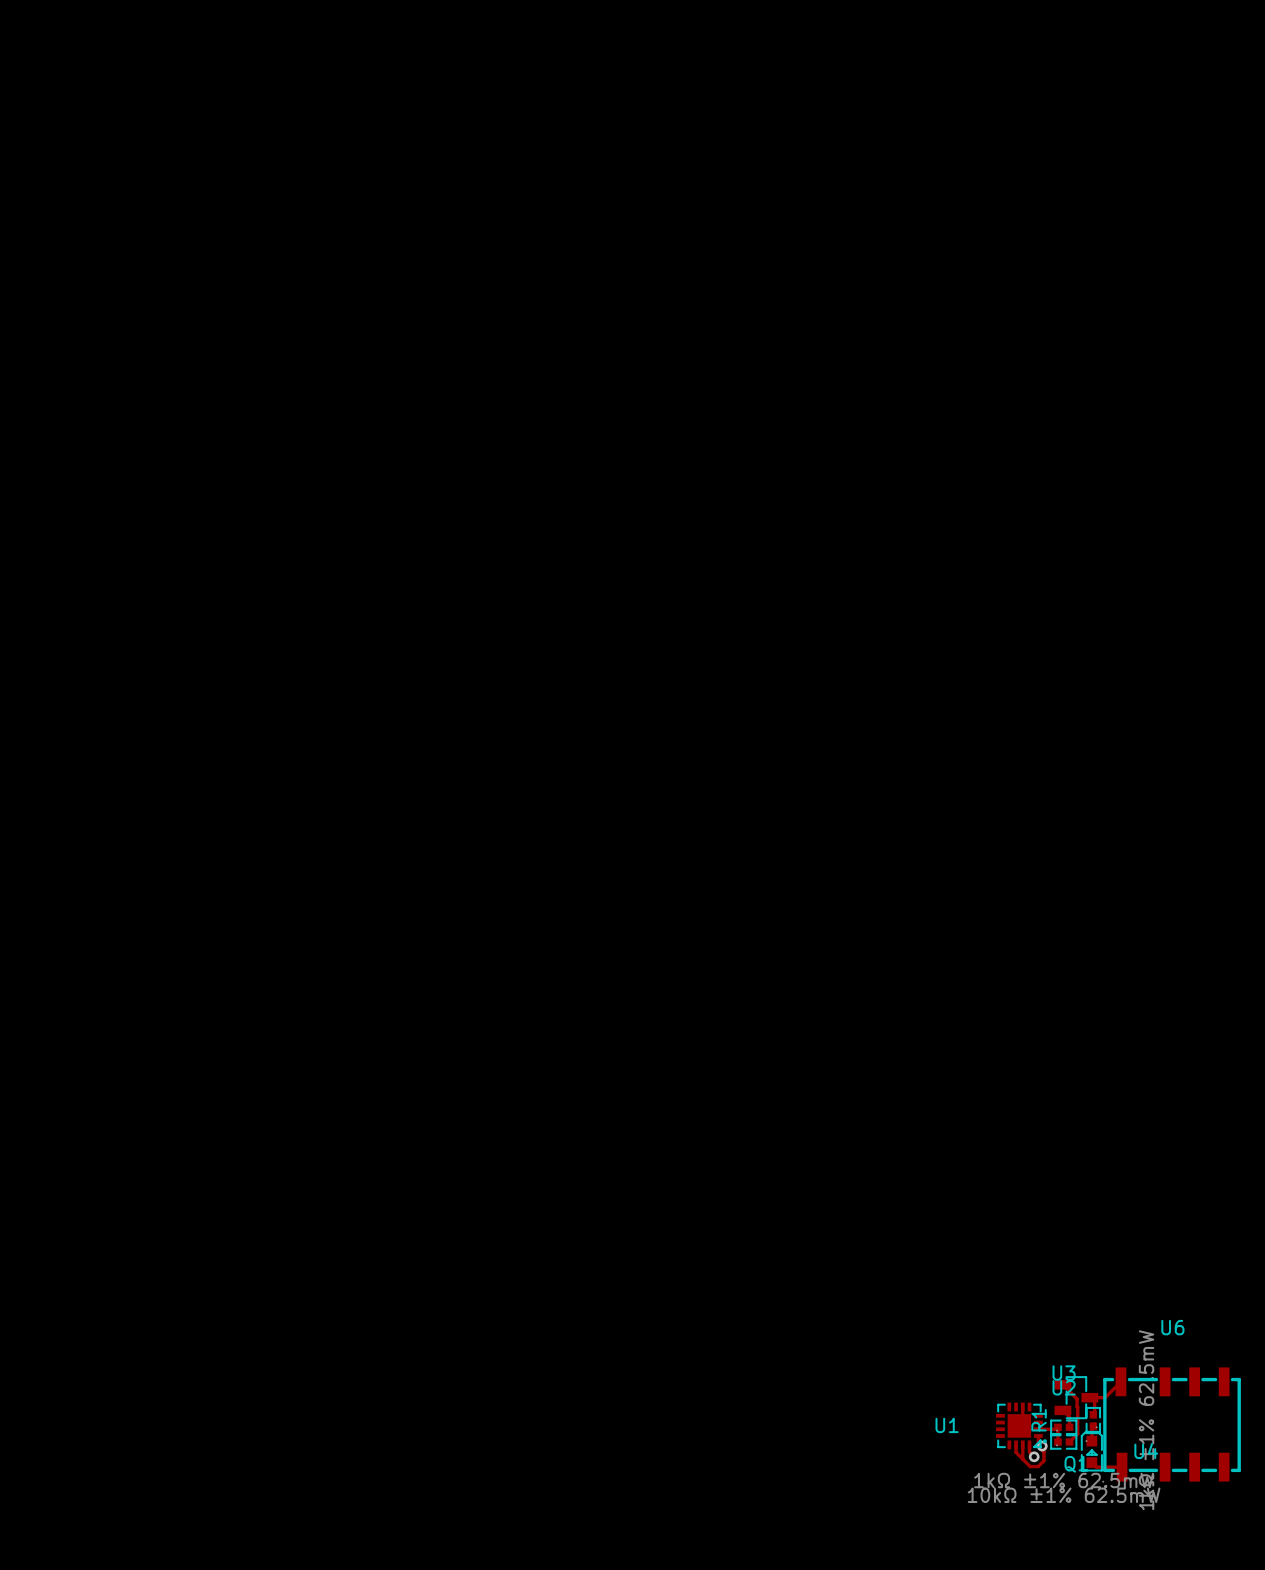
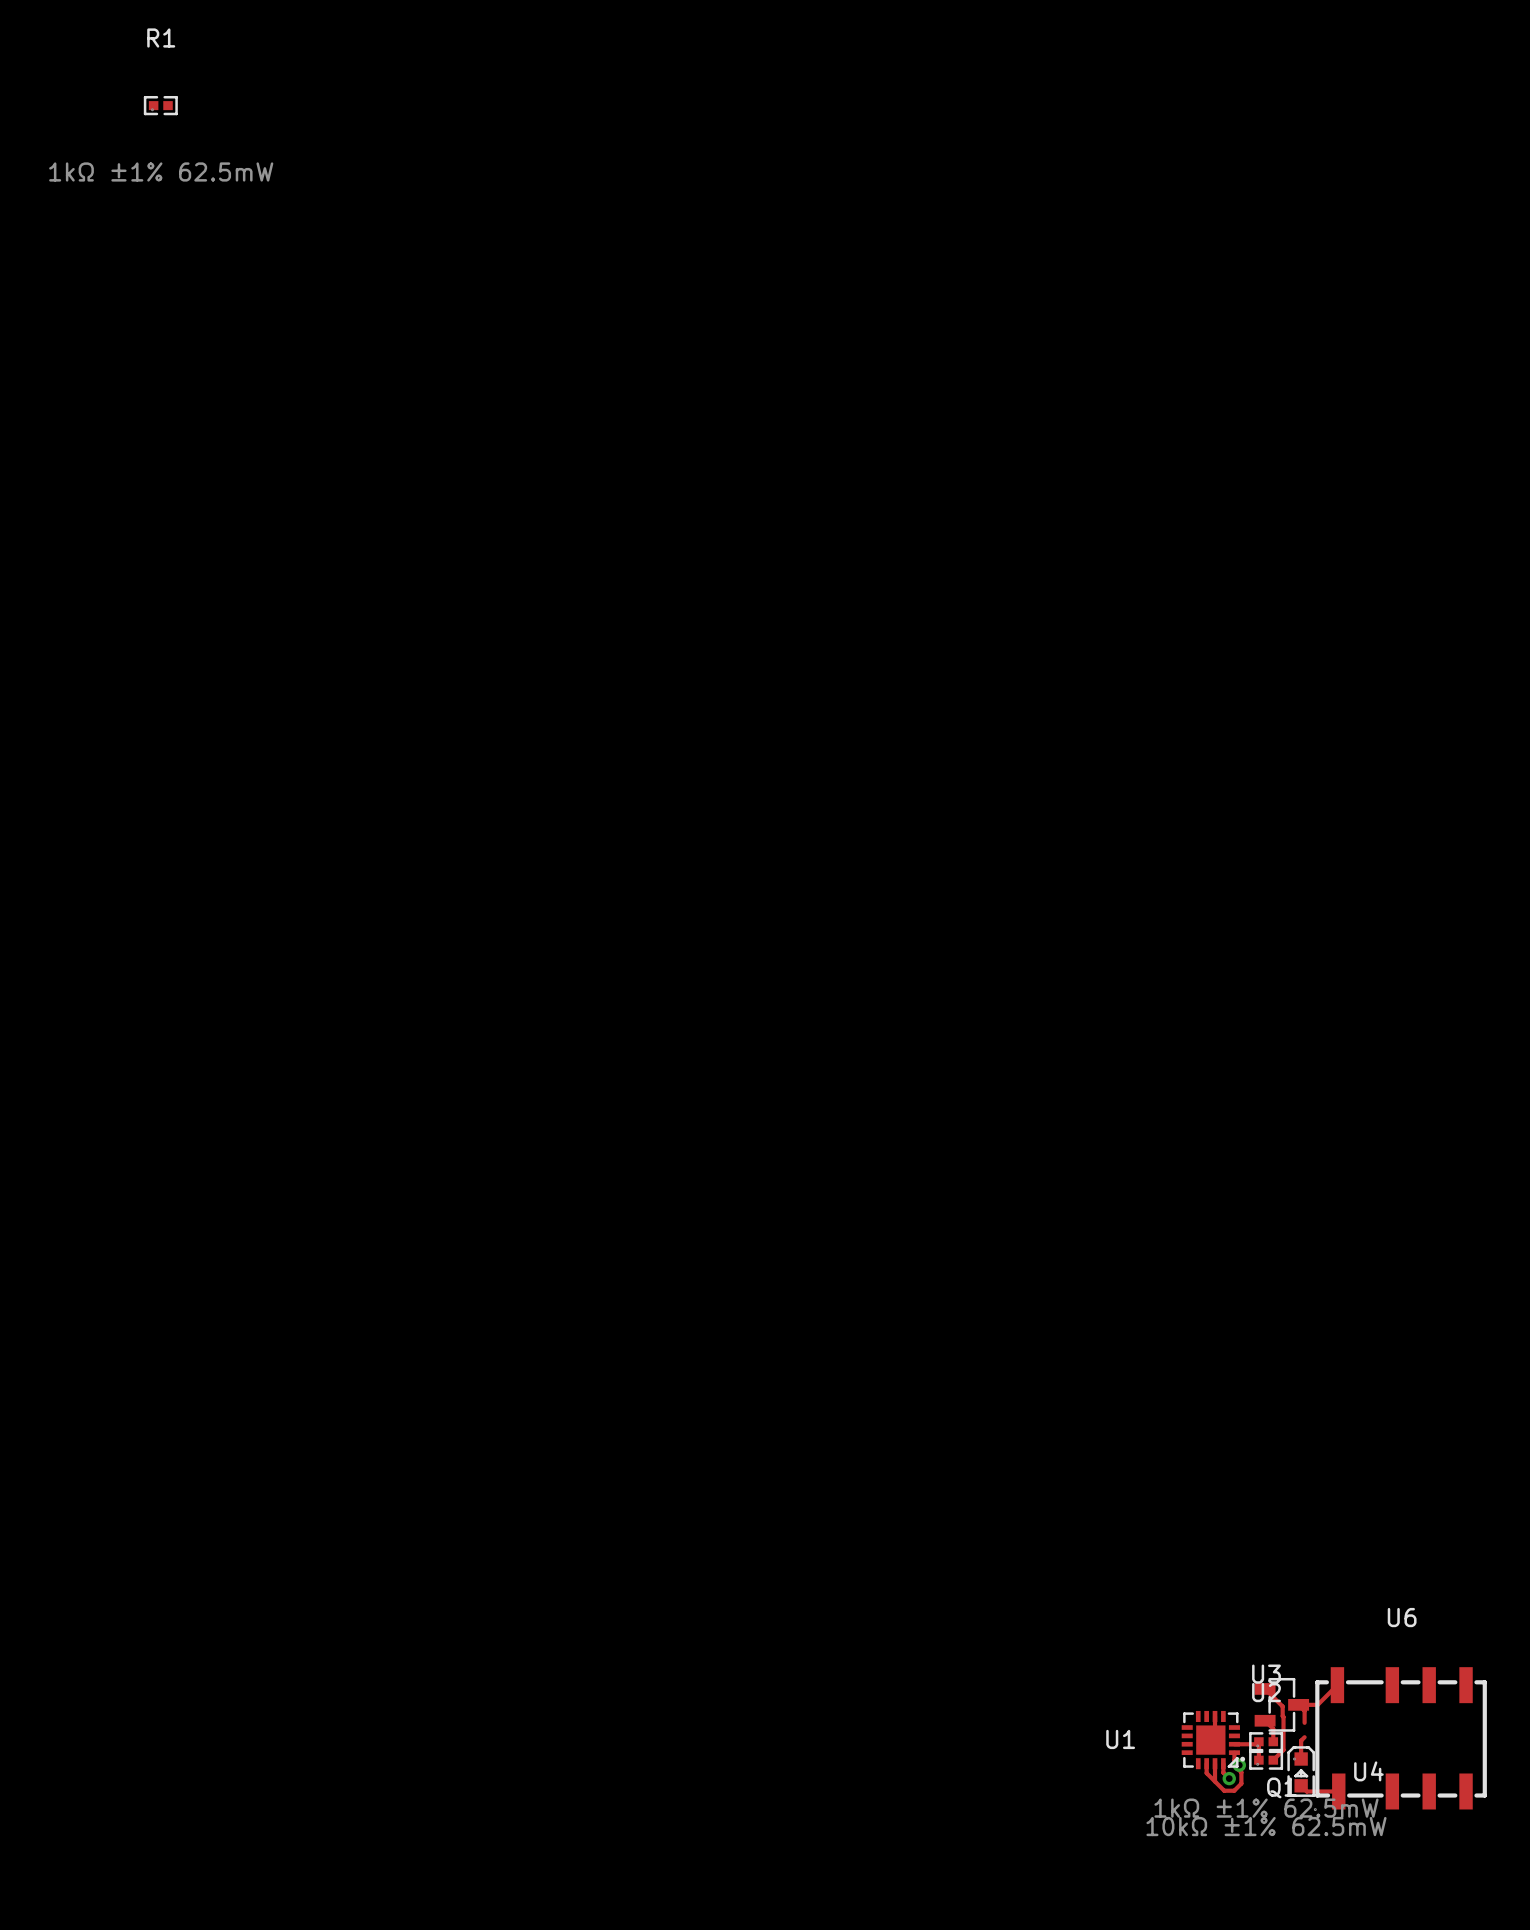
R1 rotation: 0° (1093, 1420) -> 90° clockwise (160, 105)
R1 position: (1093, 1420) -> (160, 105)

